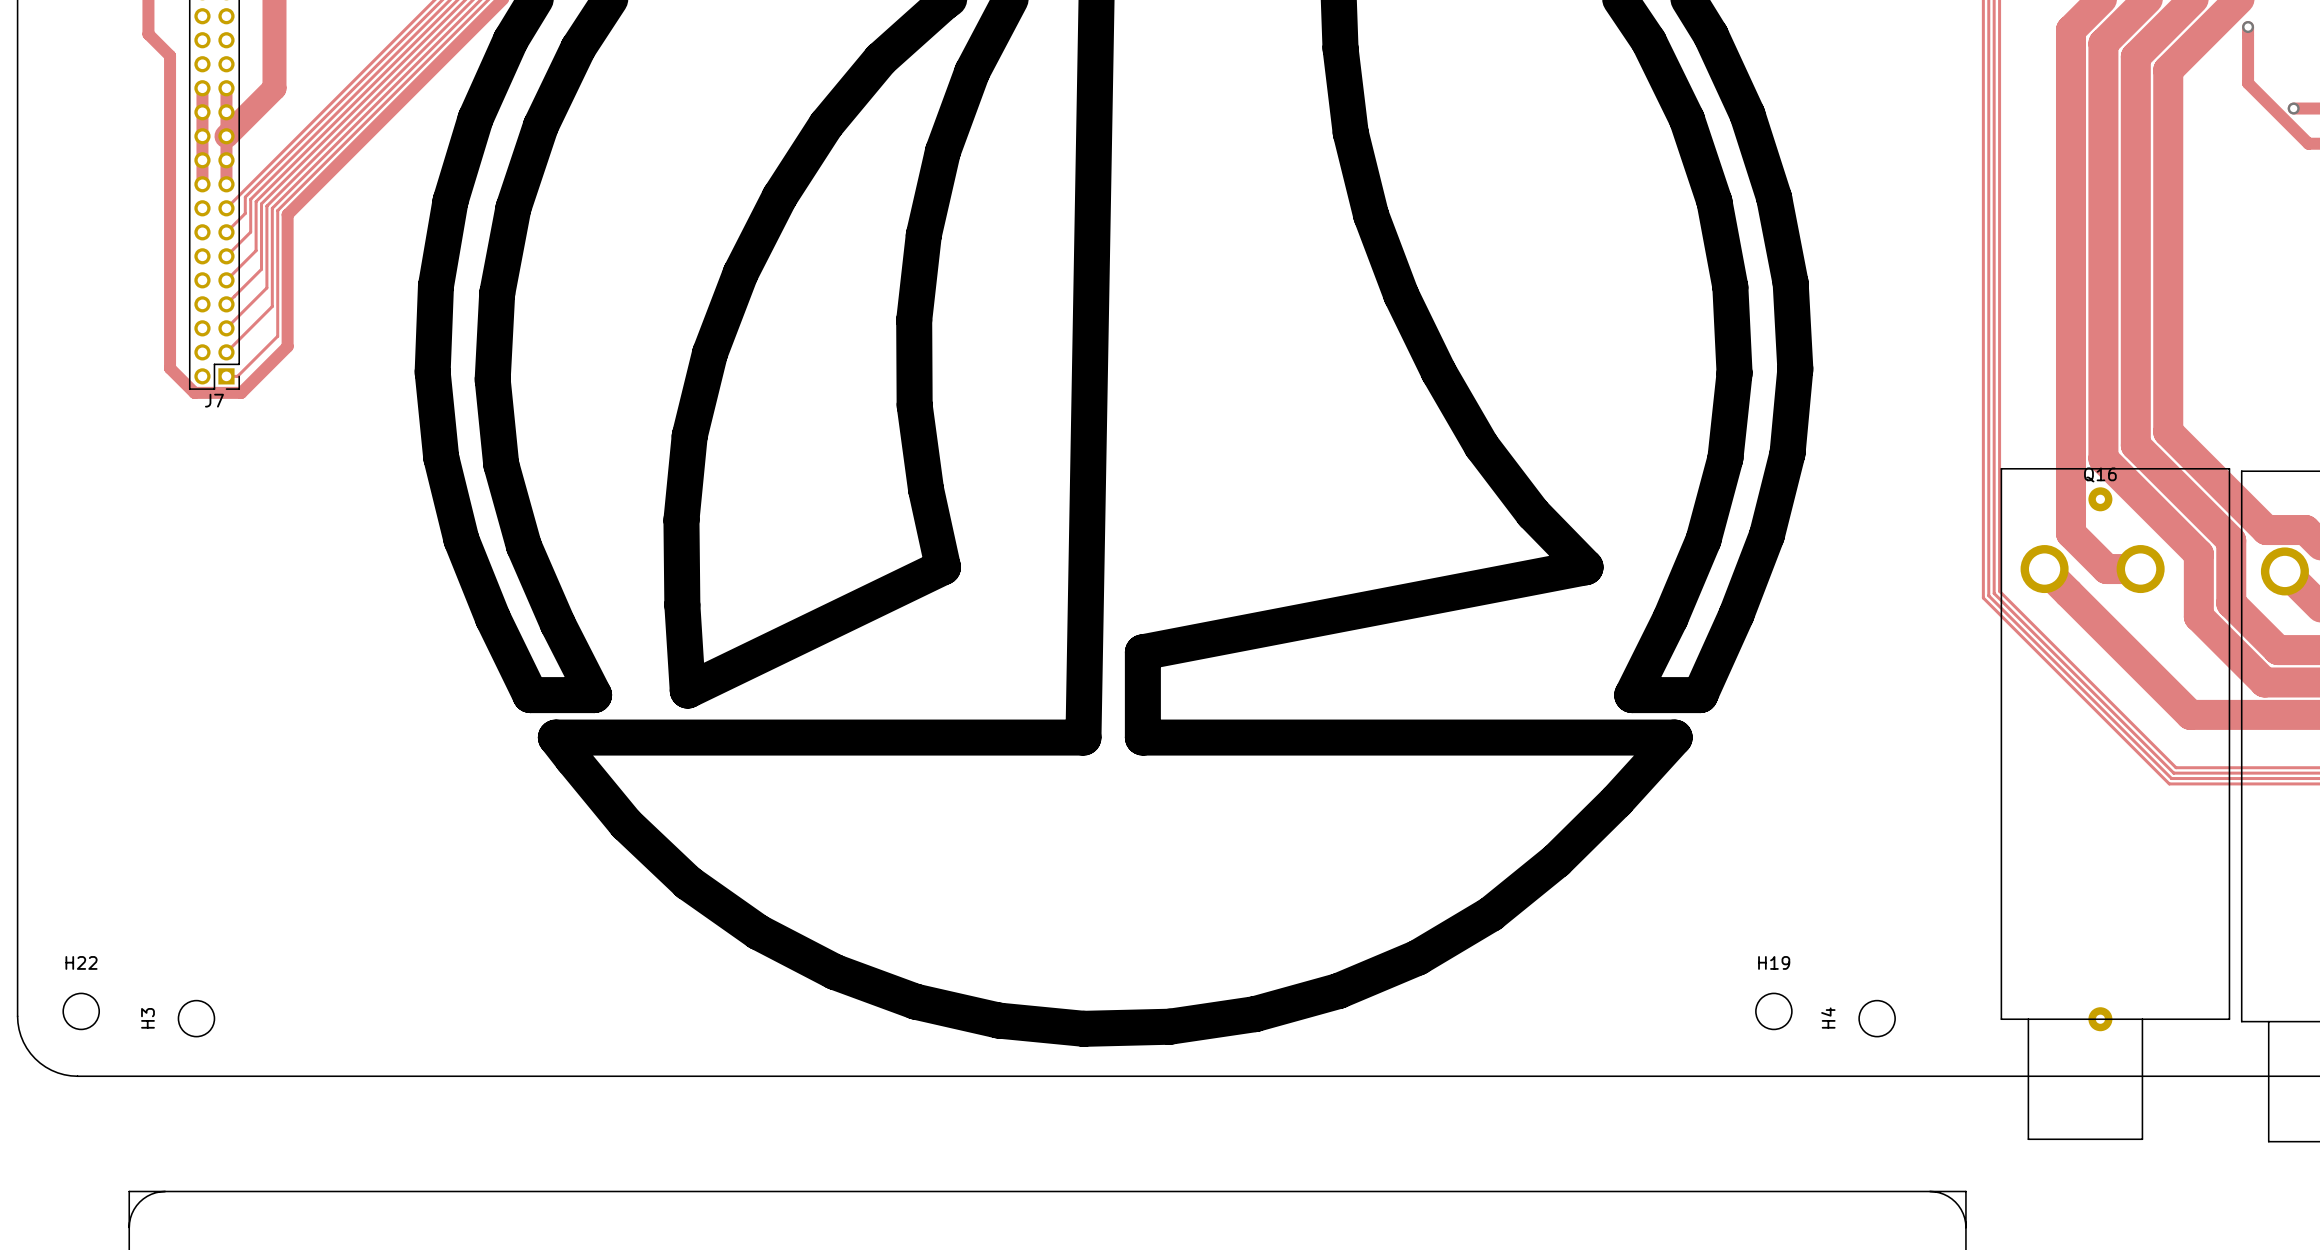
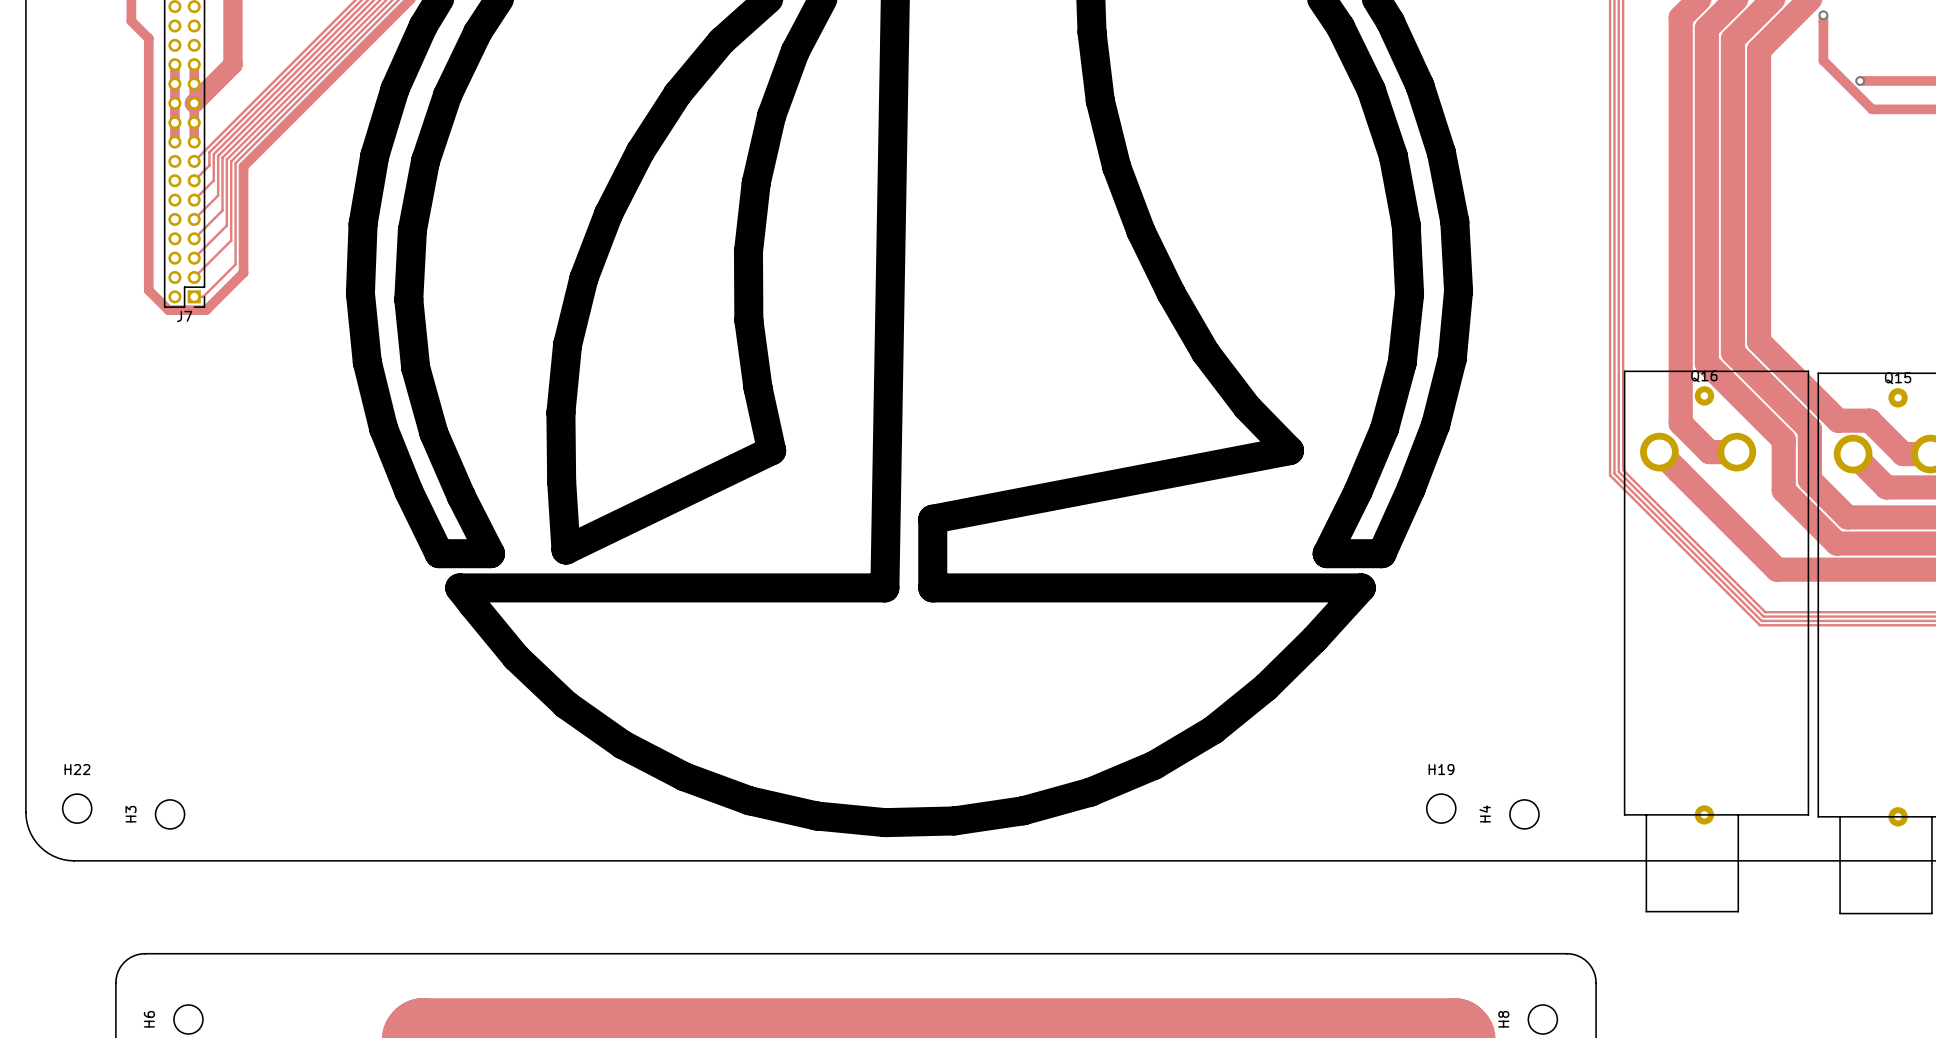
board edge: (165, 1191) (129, 1191) (129, 1227) -> none
board edge: (1929, 1191) (1965, 1191) (1965, 1227) -> none

